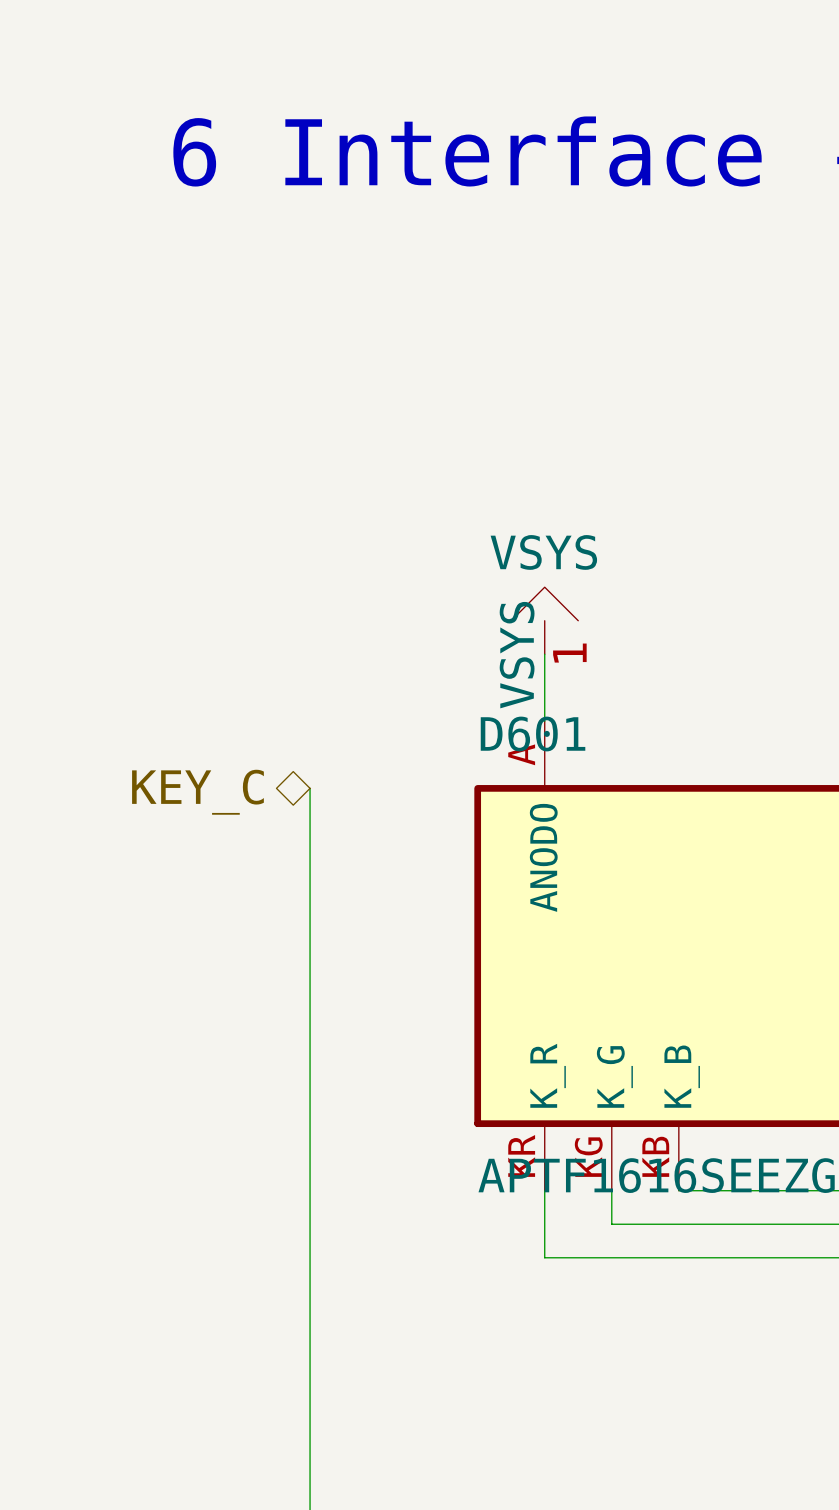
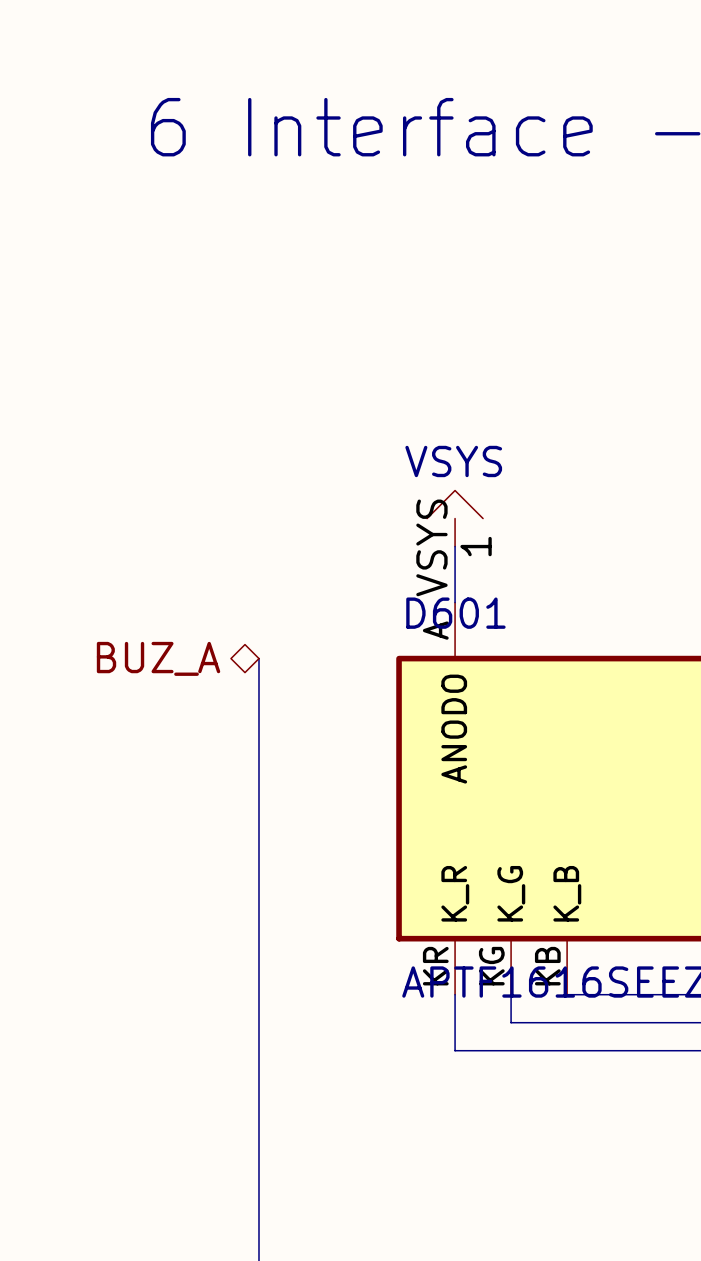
hierarchical label: KEY_C (197, 792) -> BUZ_A (158, 658)

